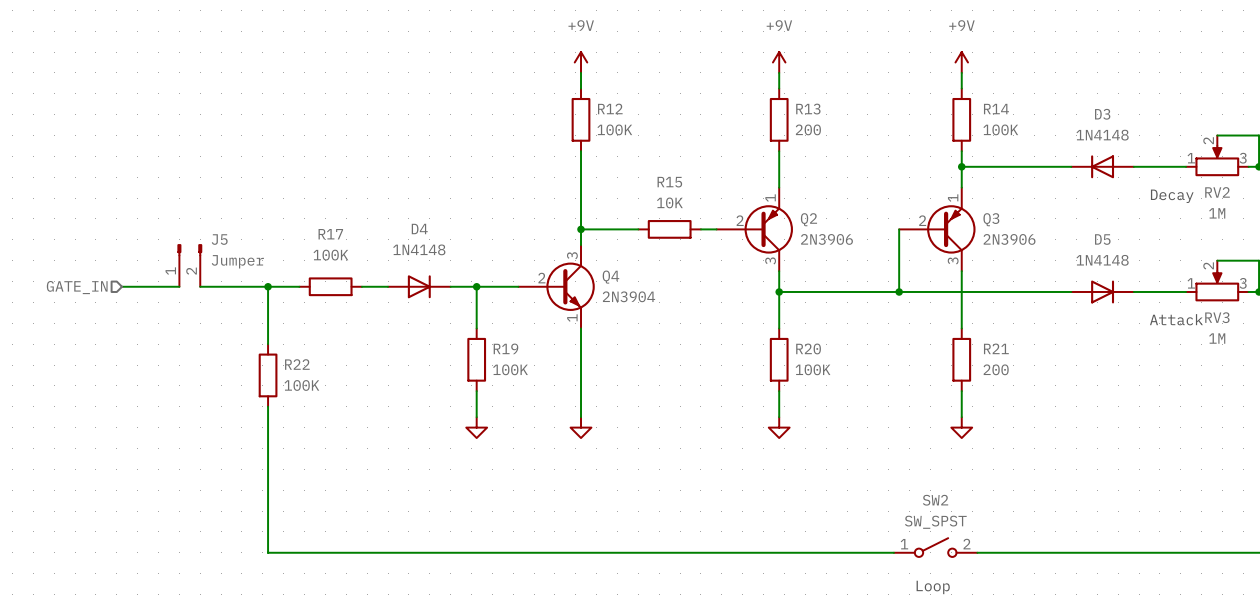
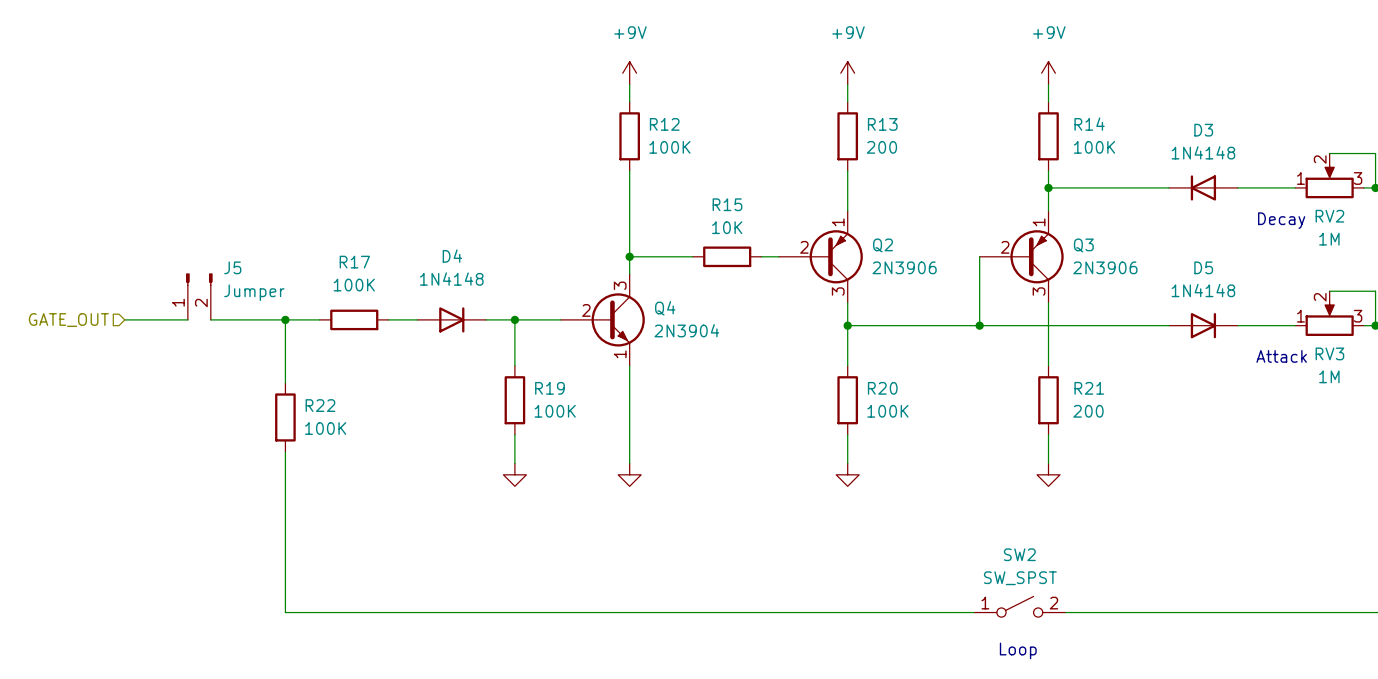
hierarchical label: GATE_IN (77, 287) -> GATE_OUT (68, 320)

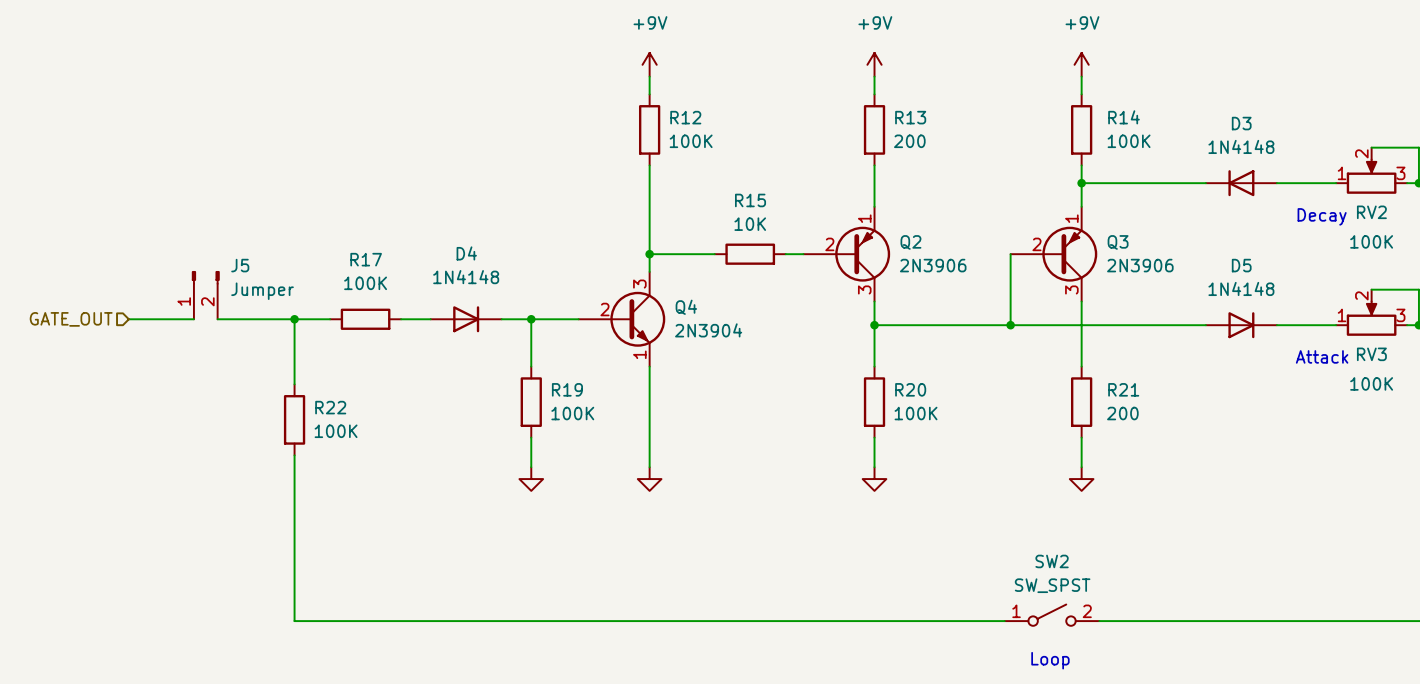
RV2 value: 1M (1329, 239) -> 100K (1371, 241)
RV3 value: 1M (1329, 376) -> 100K (1371, 383)

